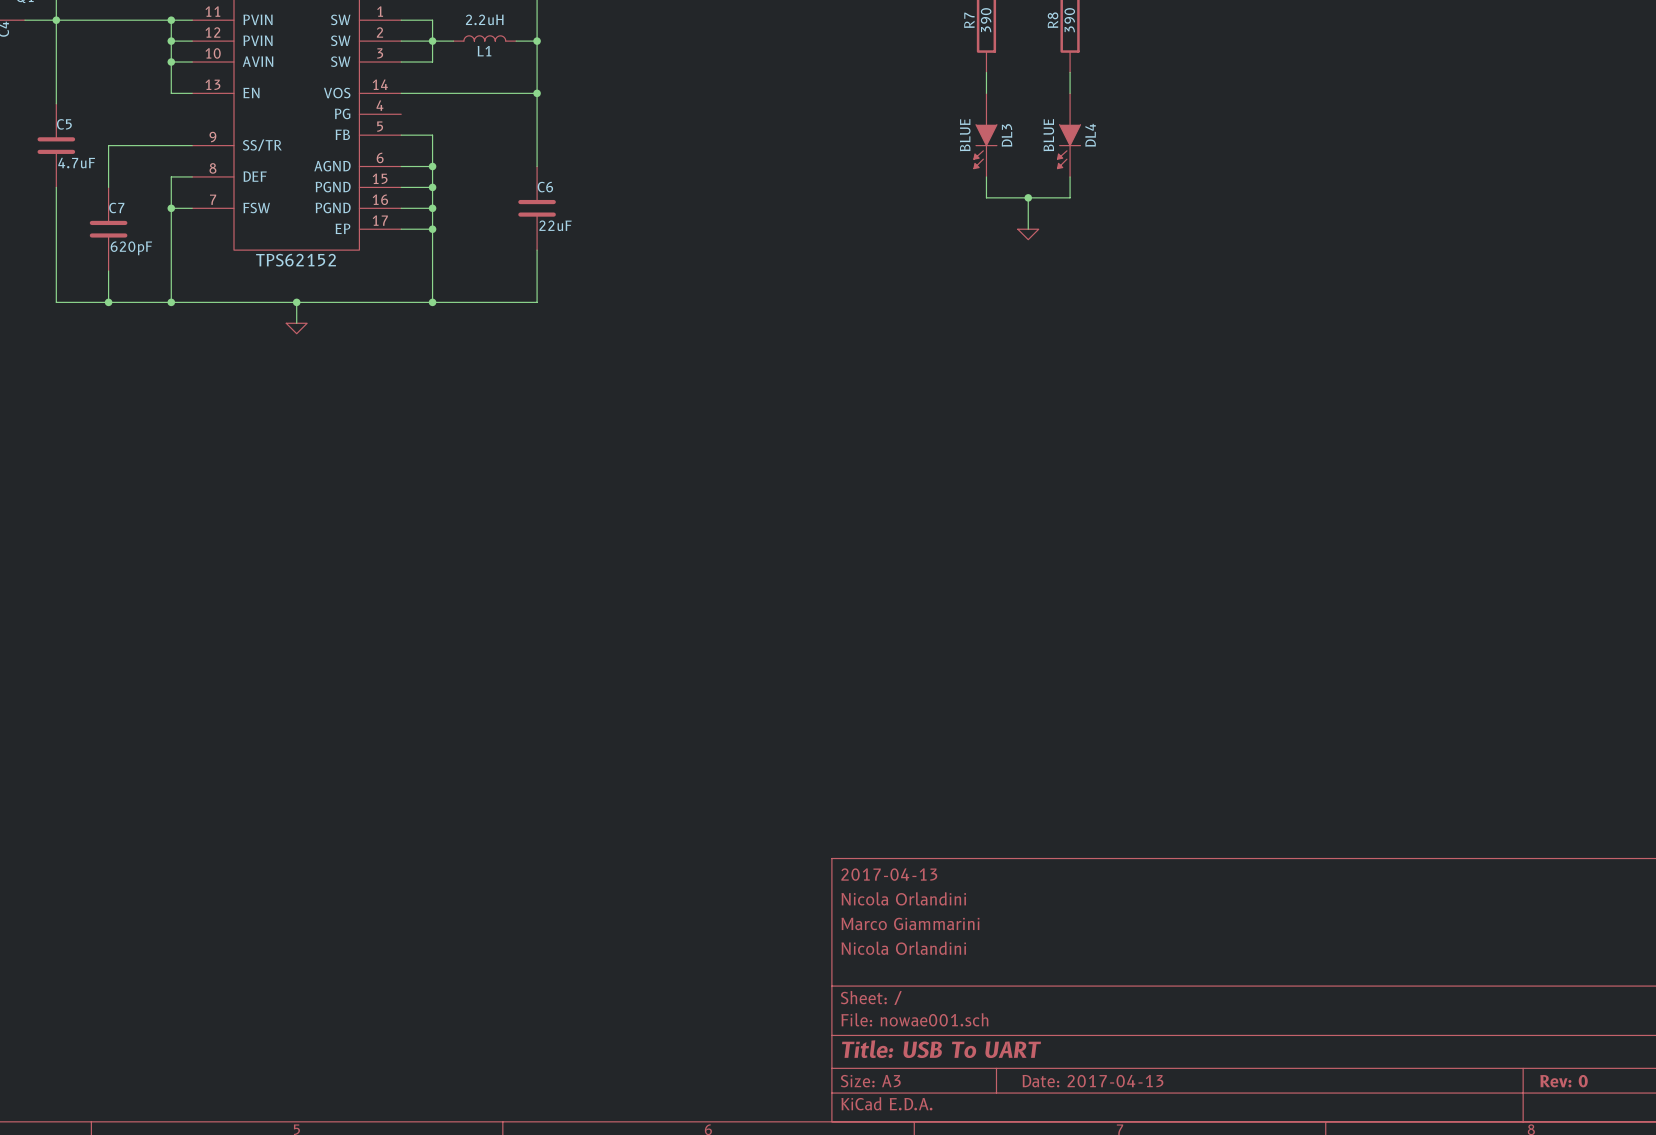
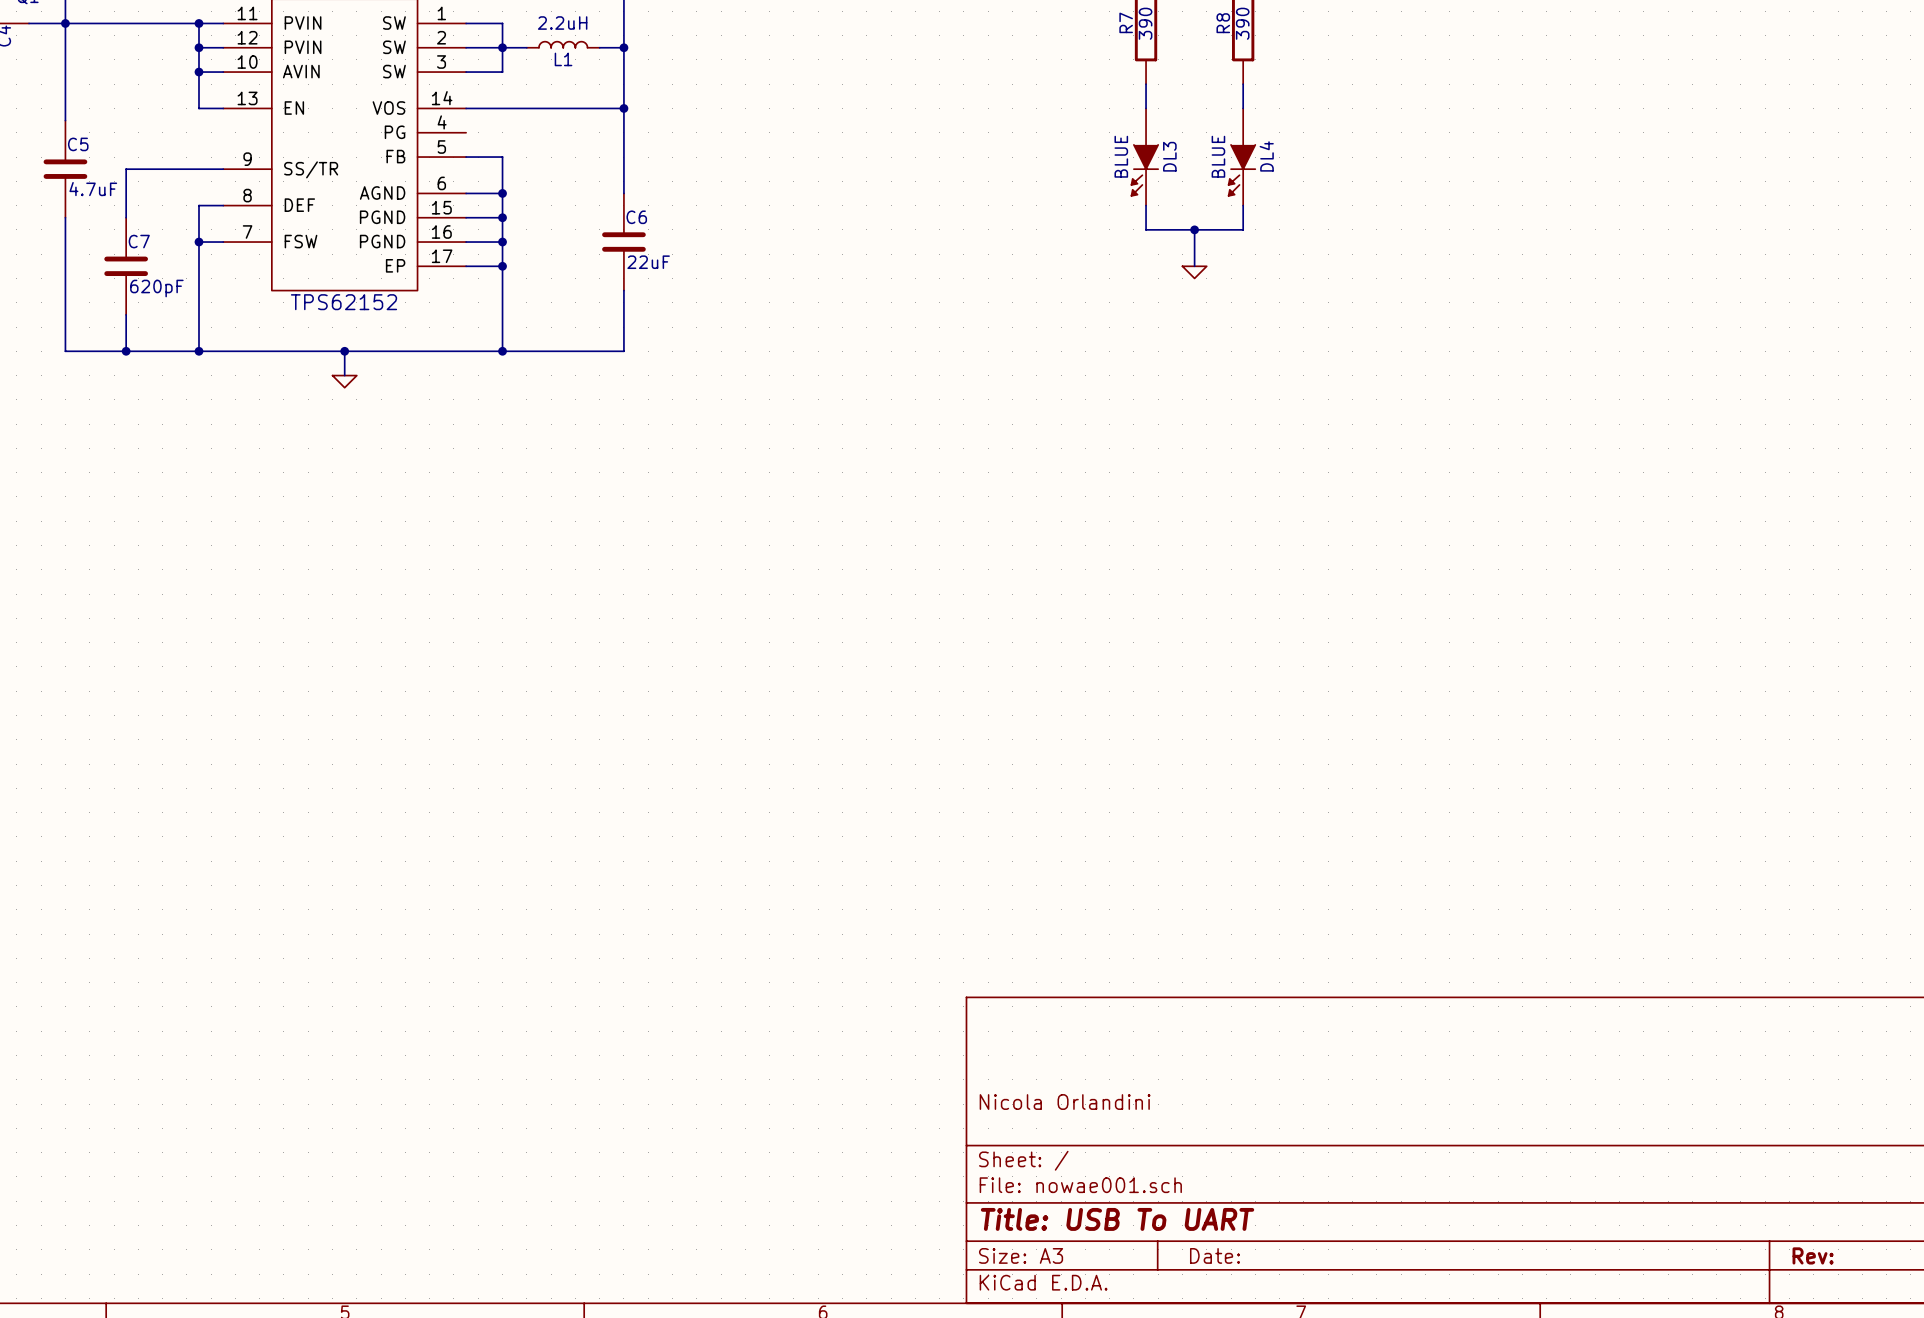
title block: 2017-04-13 (889, 874) -> none
title block: Nicola Orlandini (903, 898) -> none
title block: Marco Giammarini (910, 923) -> none
title block: Date: 2017-04-13 (1092, 1081) -> Date: (1214, 1255)
title block: Rev: 0 (1564, 1081) -> Rev: (1813, 1255)

